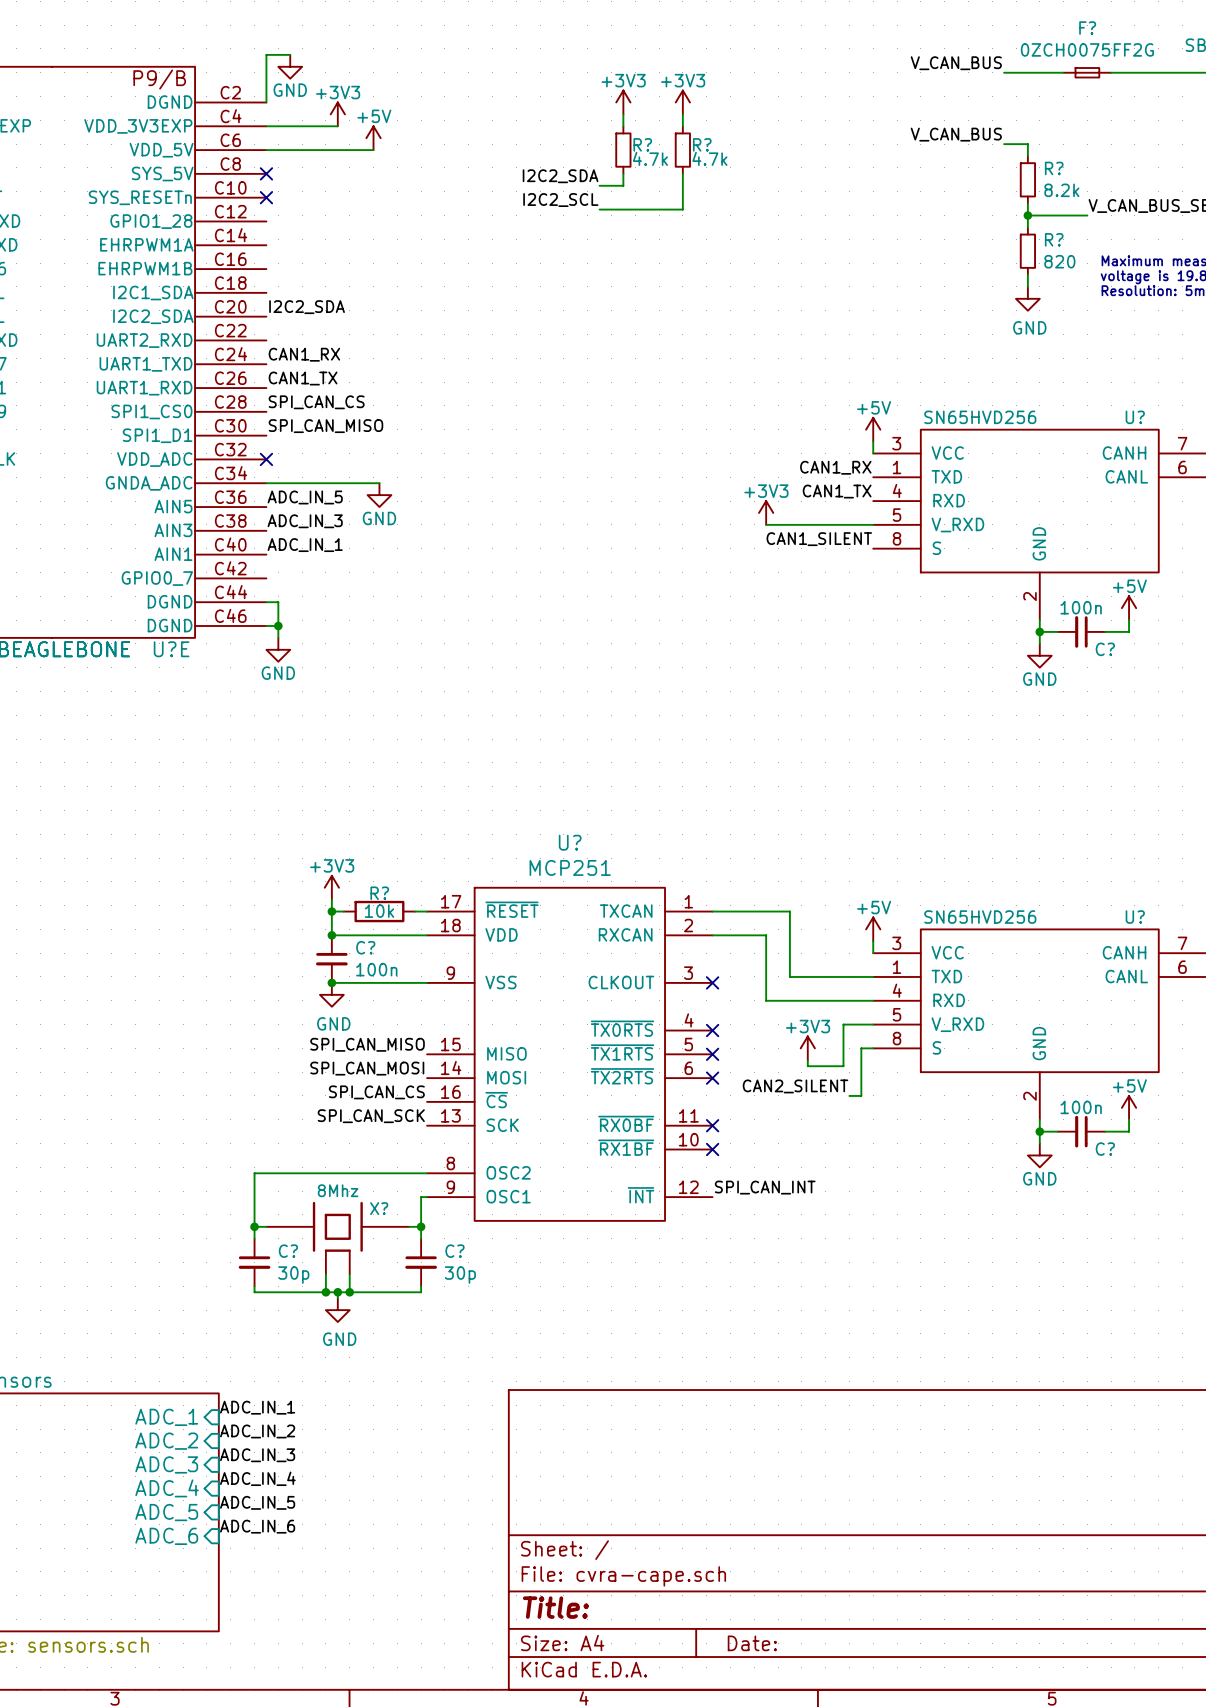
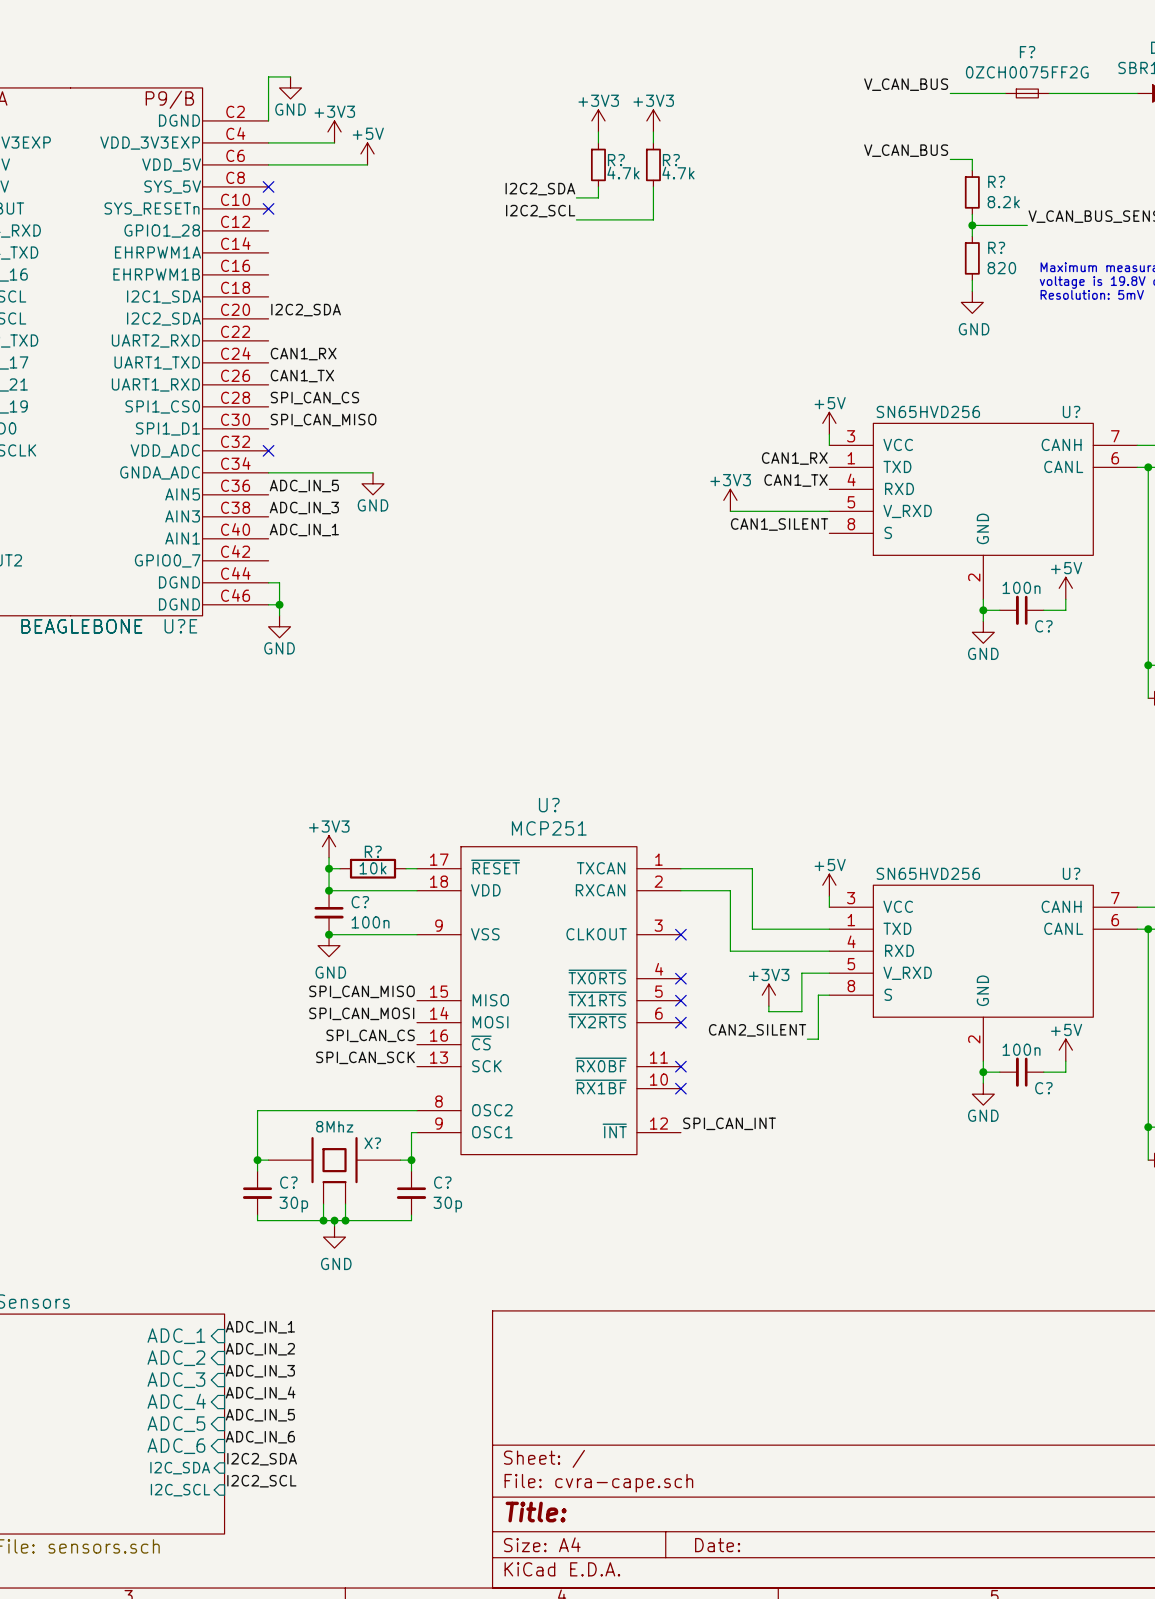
label: none -> I2C2_SDA (262, 1459)
sheet pin: none -> I2C_SDA (180, 1468)
label: none -> I2C2_SCL (261, 1481)
sheet pin: none -> I2C_SCL (180, 1490)

